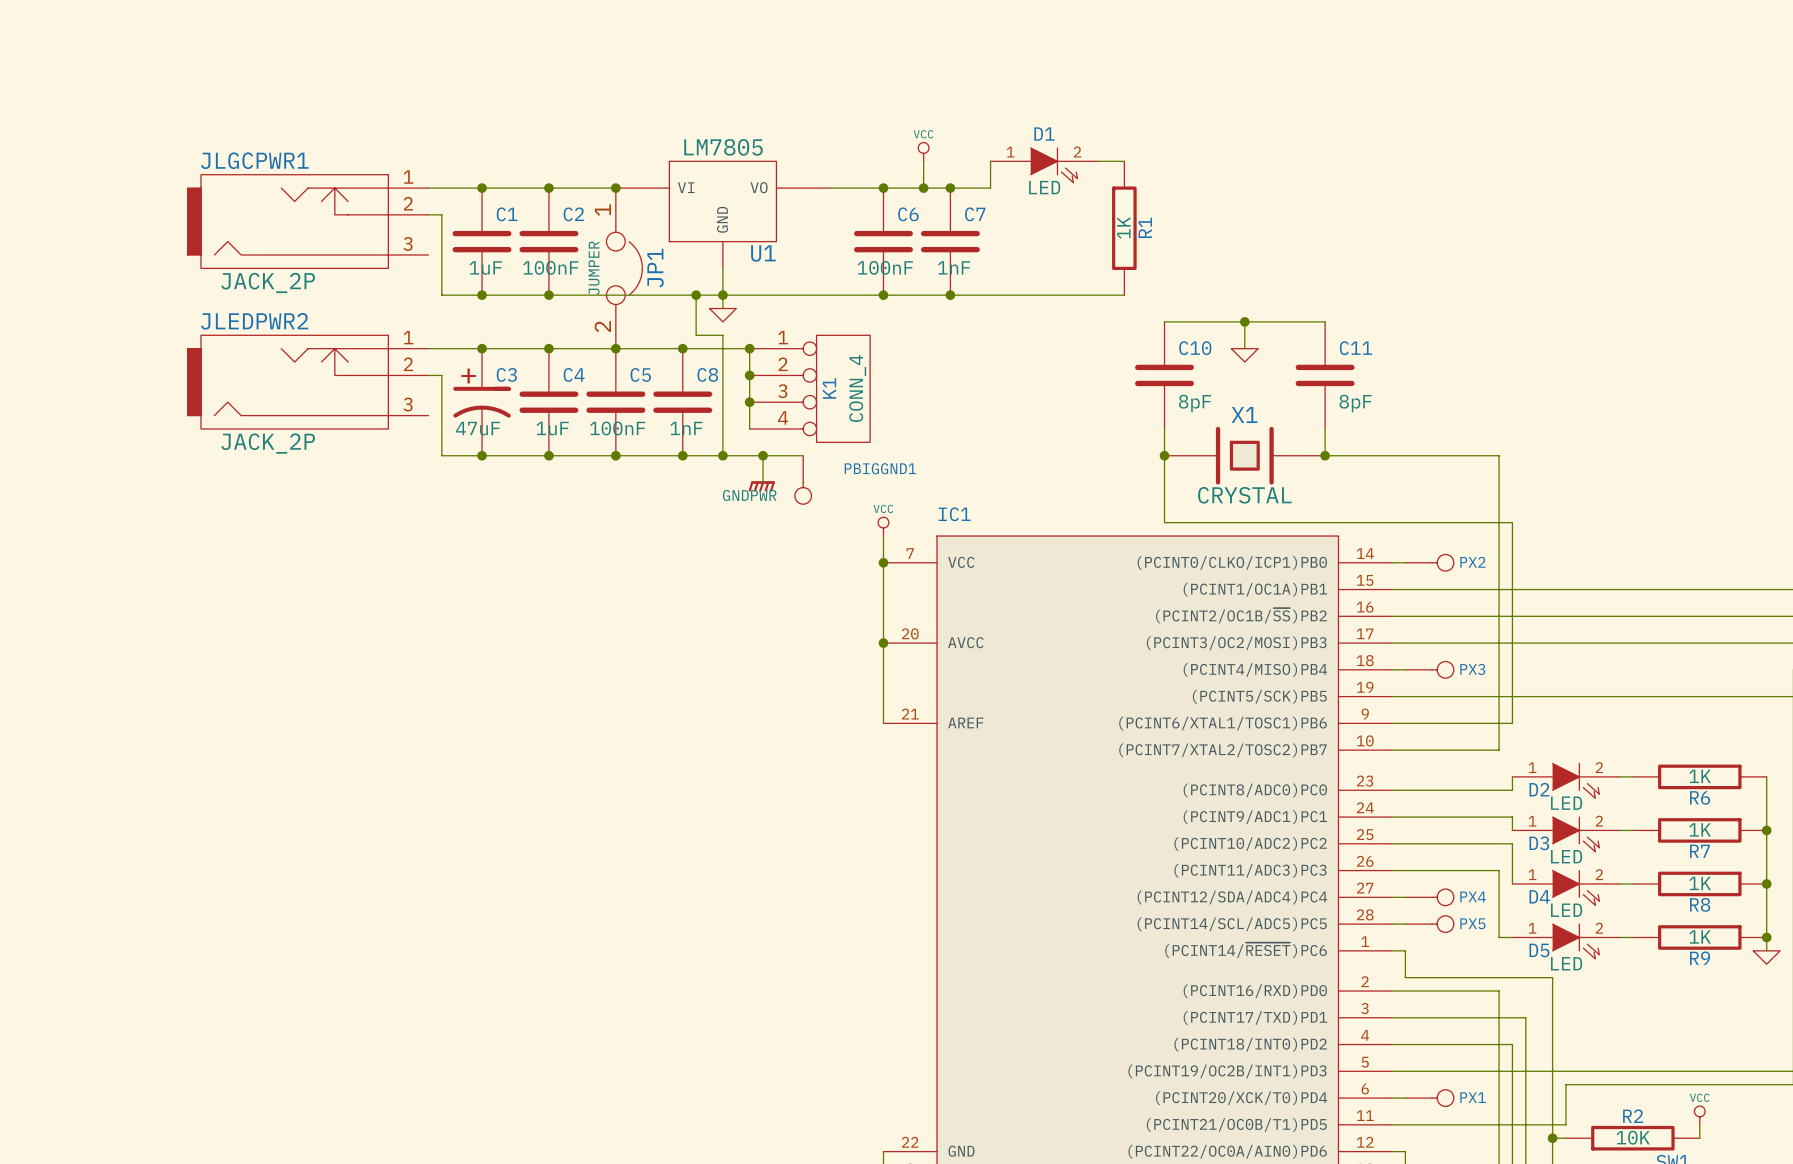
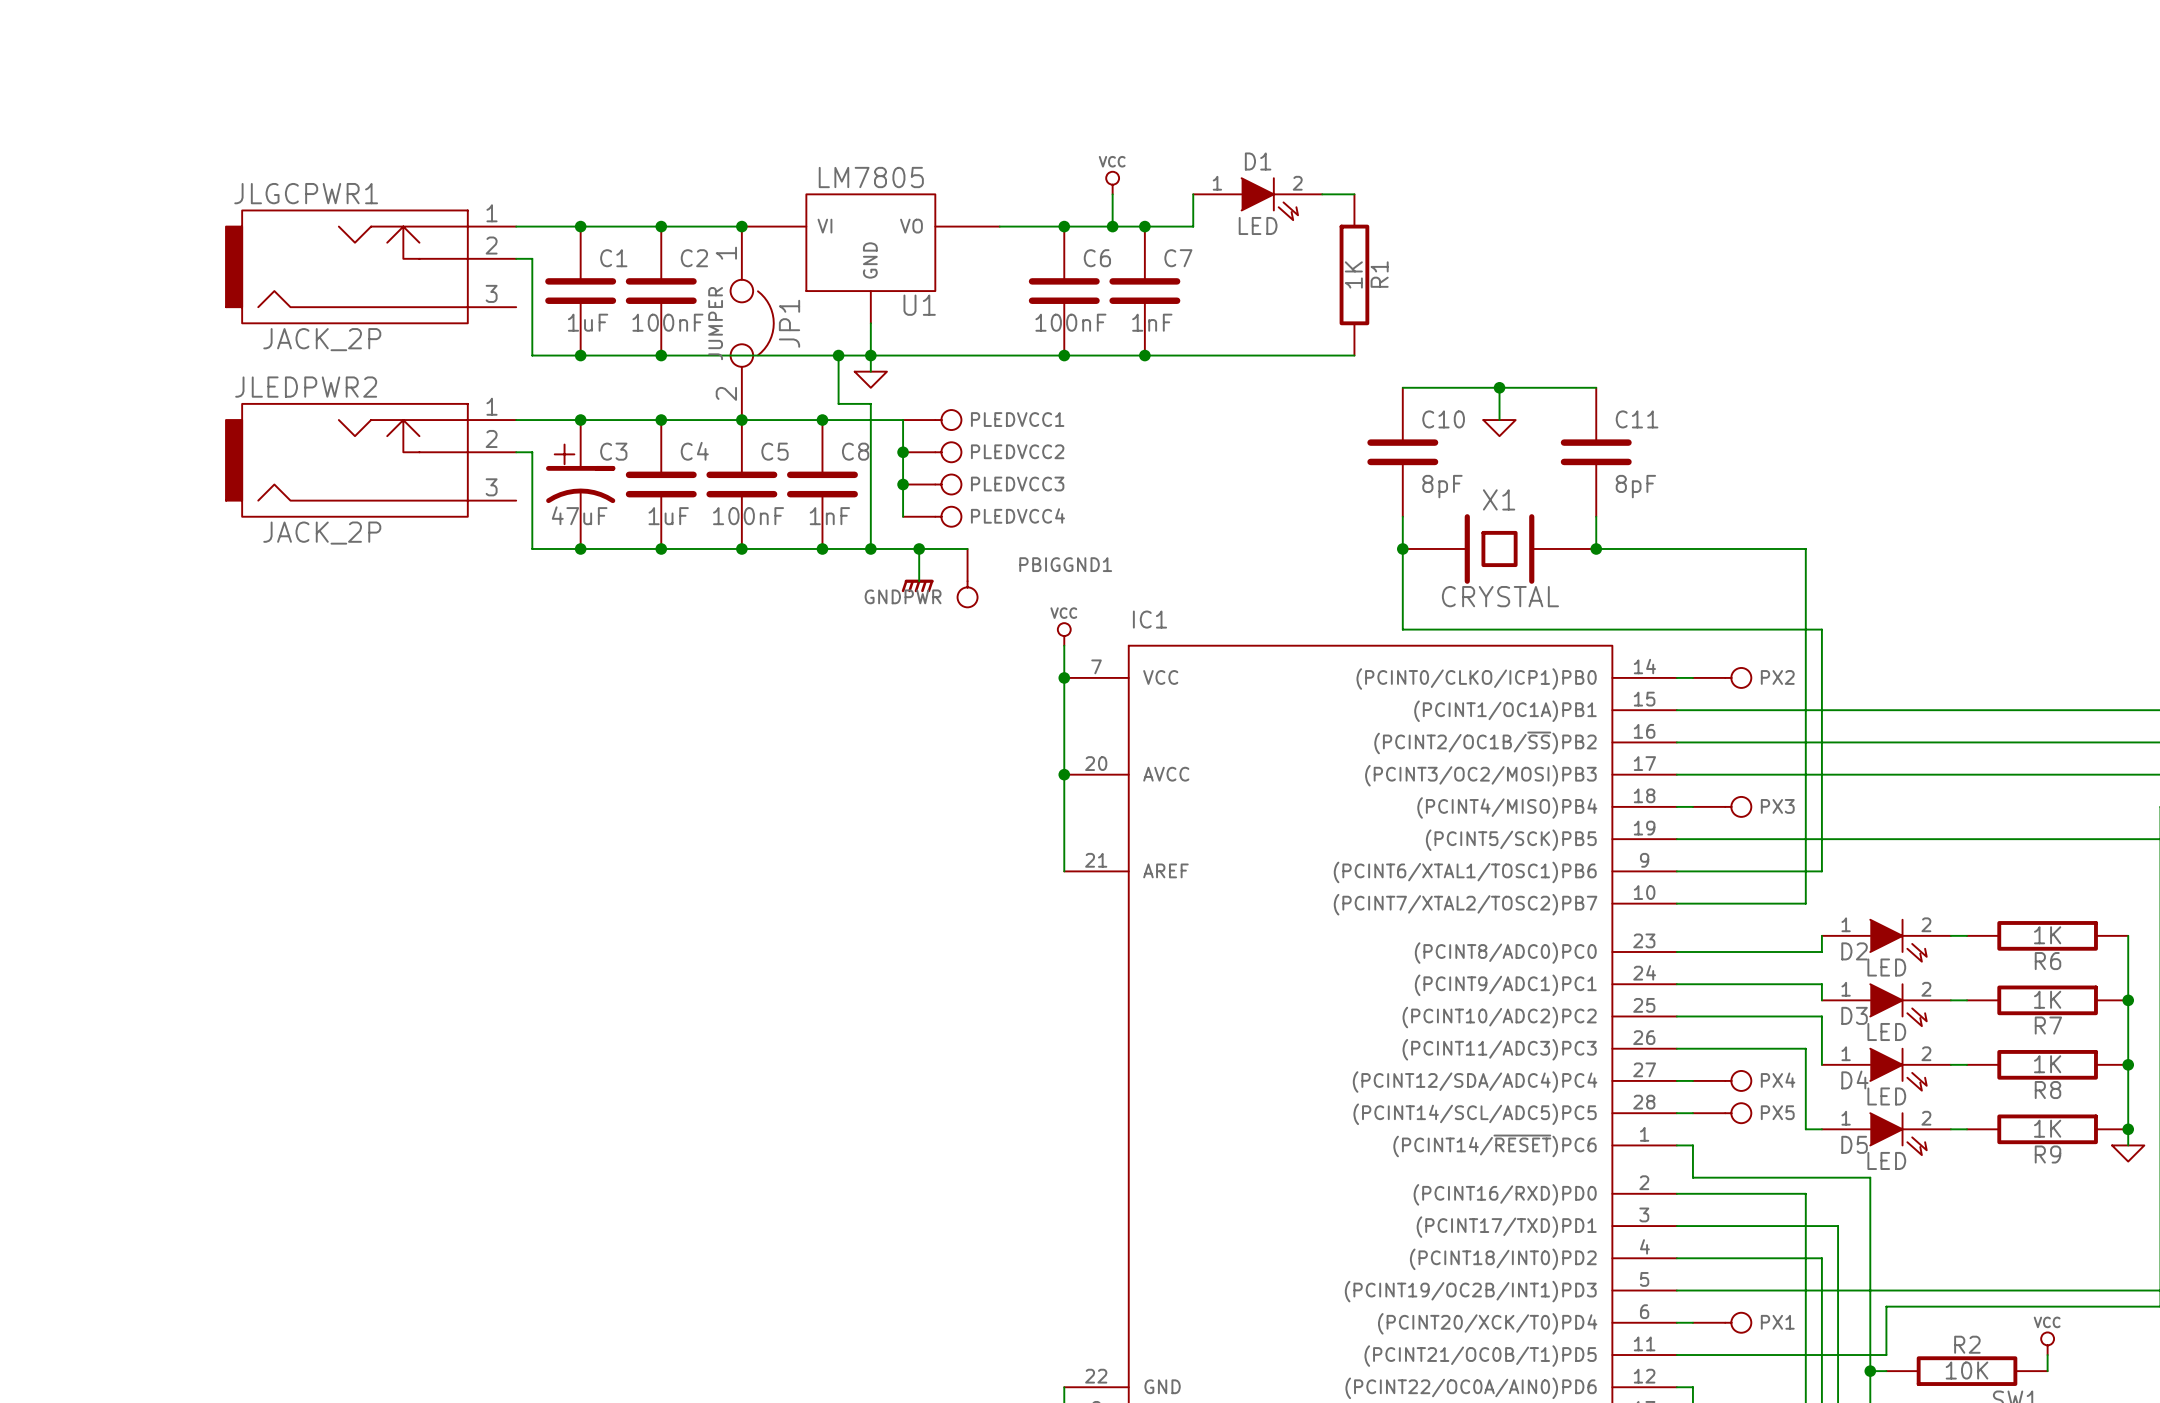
junction: (749, 348) -> none
PLEDVCC1: none -> (932, 420)
PLEDVCC2: none -> (932, 452)
K1: CONN_4 (809, 388) -> none
PLEDVCC3: none -> (932, 484)
PLEDVCC4: none -> (932, 516)

